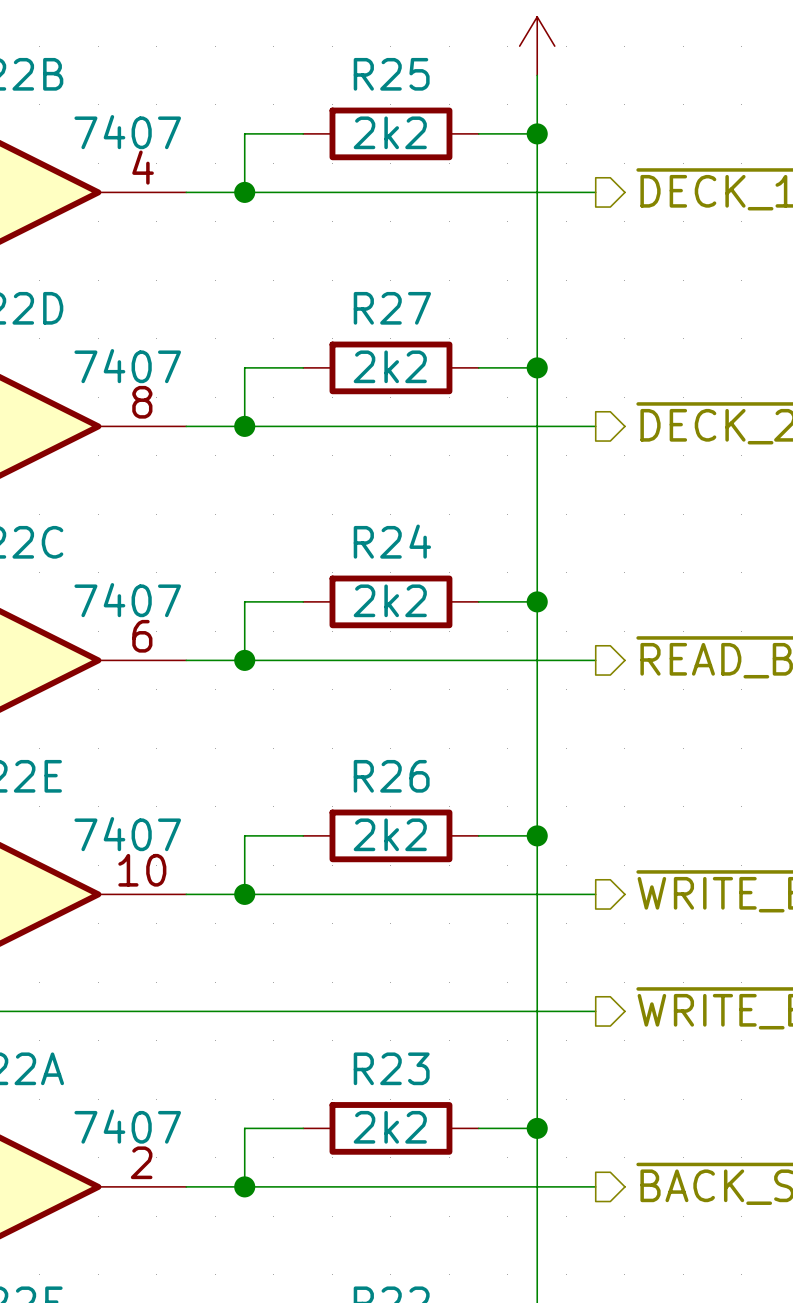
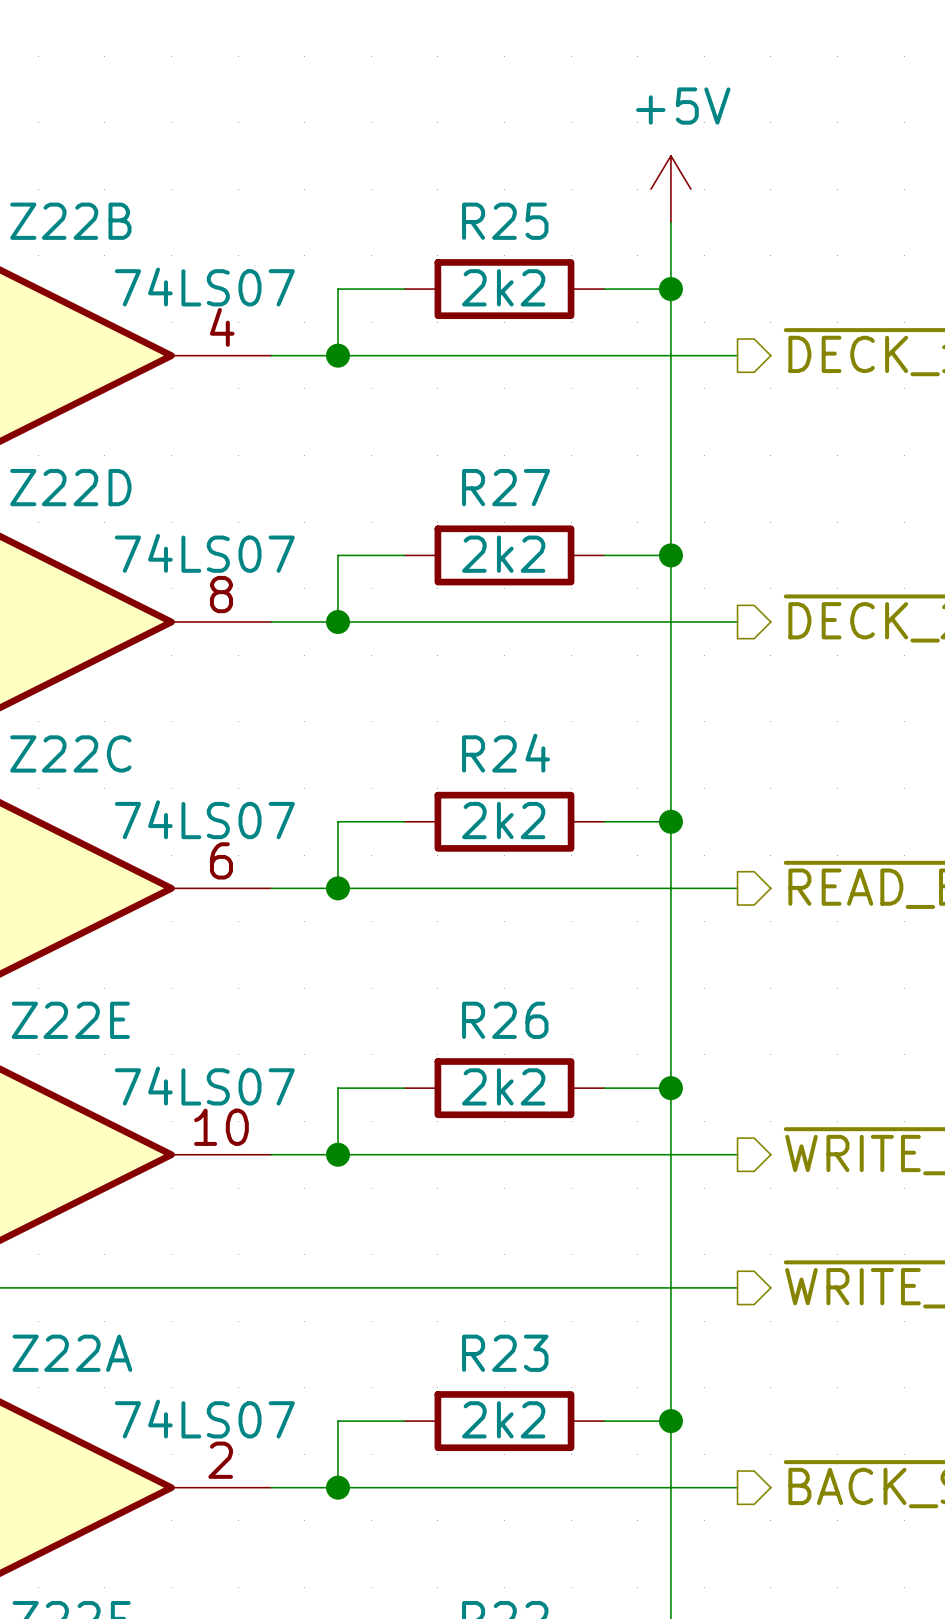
Z22B value: 7407 (127, 132) -> 74LS07 (204, 287)
Z22D value: 7407 (127, 366) -> 74LS07 (204, 553)
Z22C value: 7407 (127, 600) -> 74LS07 (204, 819)
Z22E value: 7407 (127, 834) -> 74LS07 (204, 1086)
Z22A value: 7407 (127, 1126) -> 74LS07 (204, 1419)

